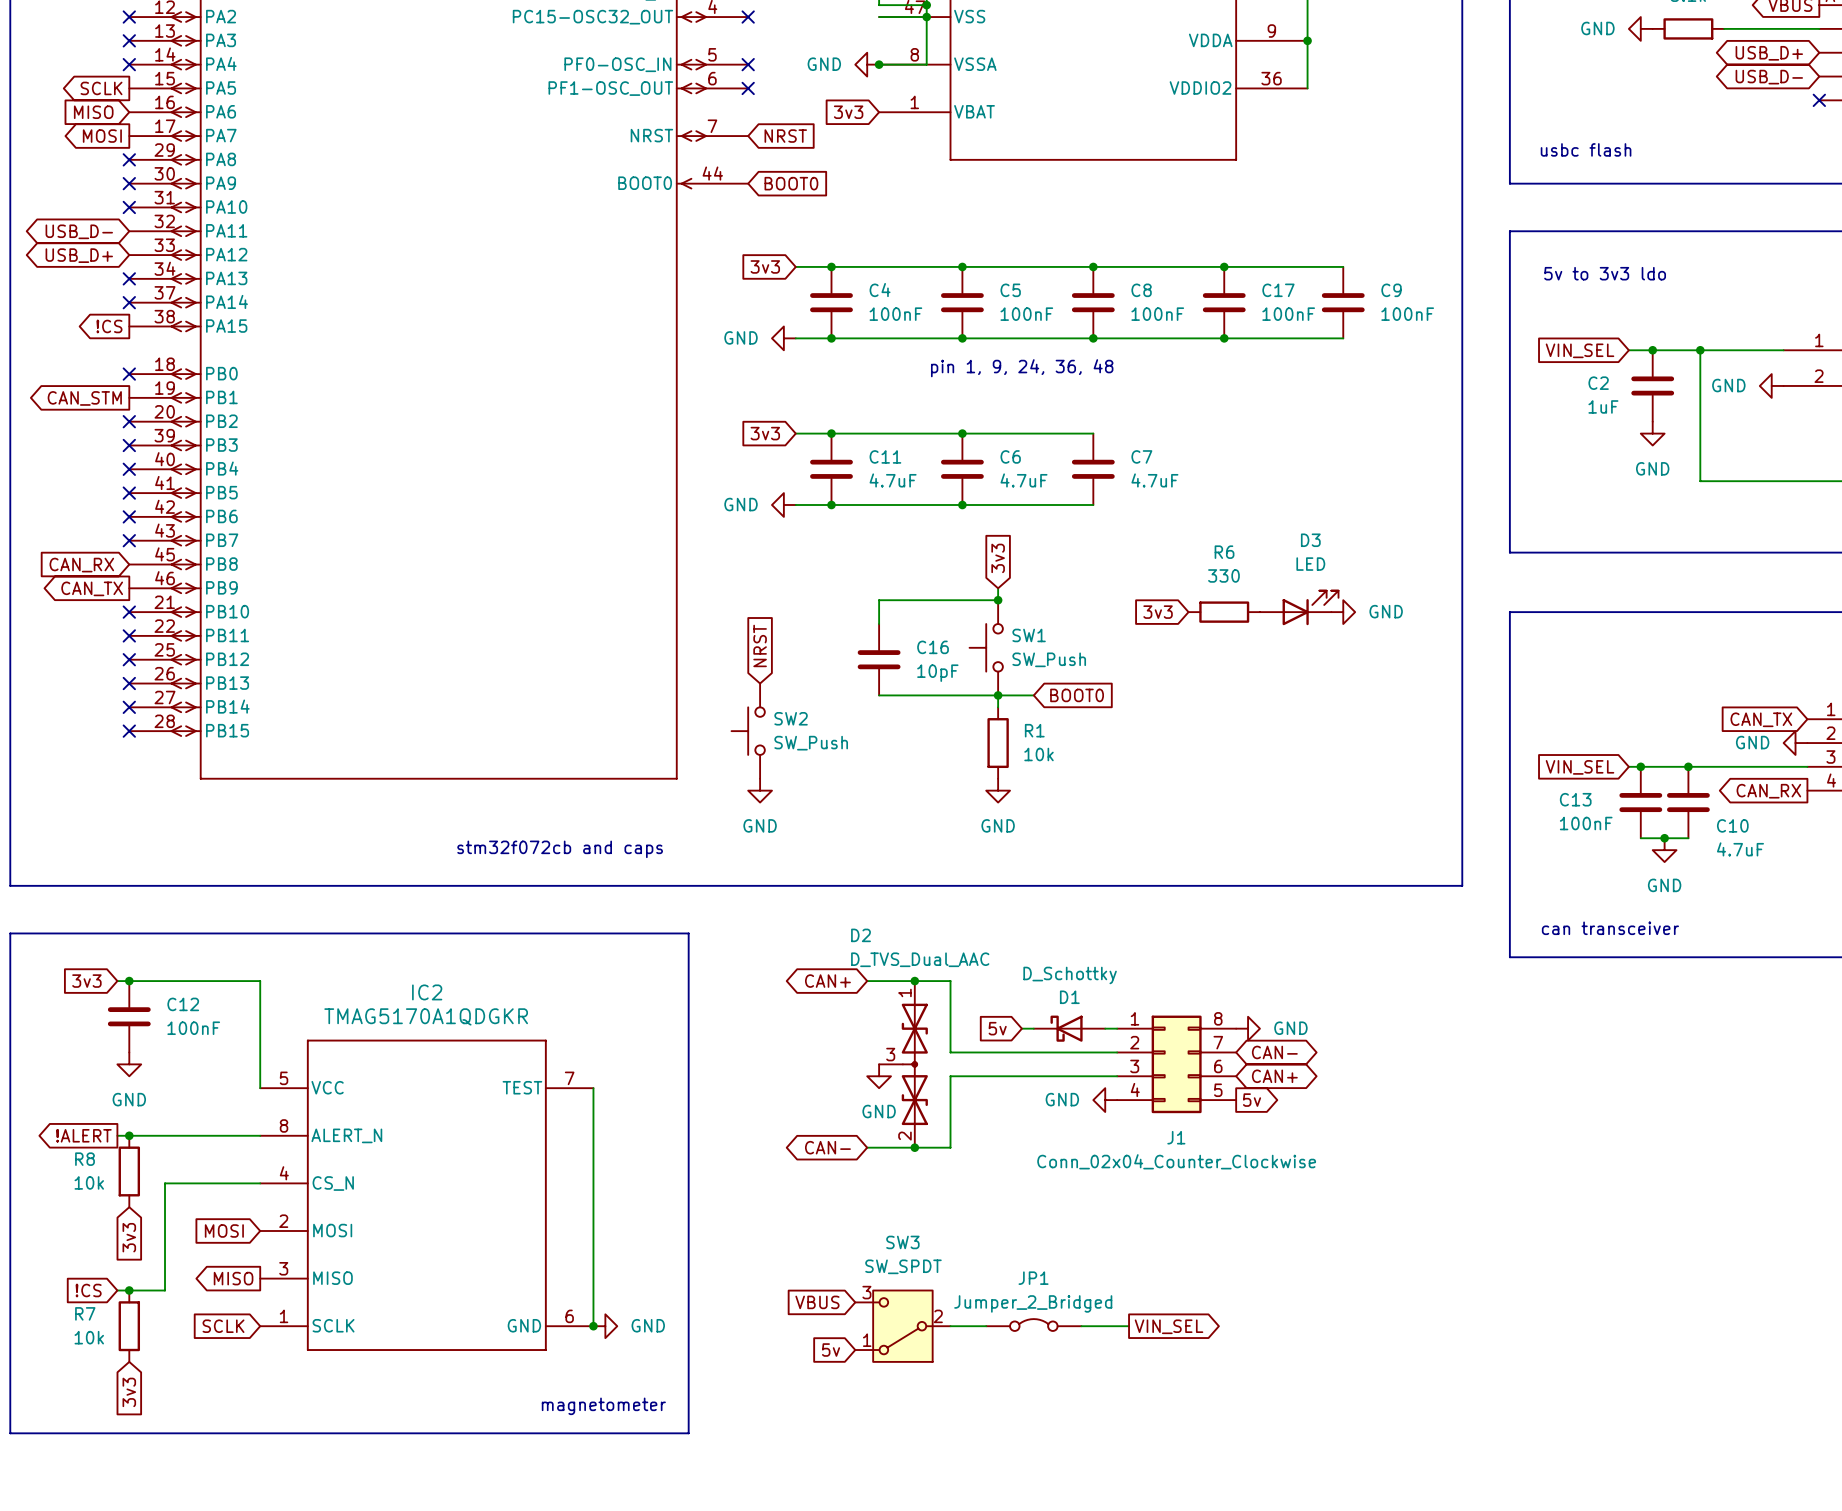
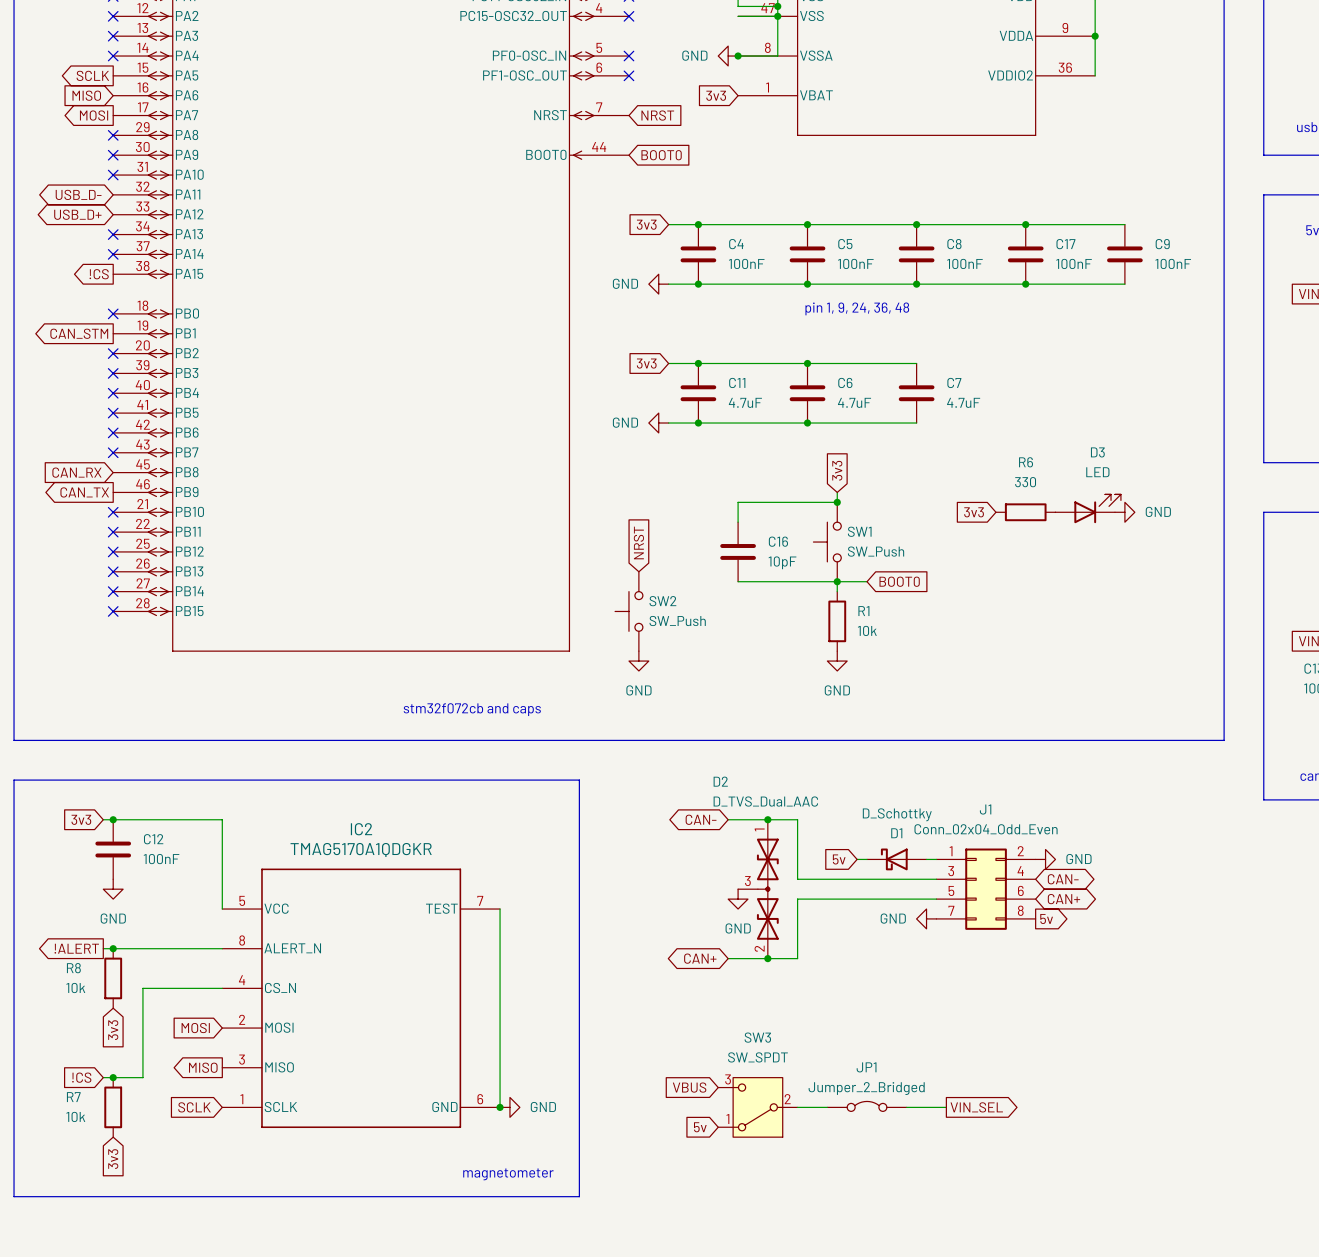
global label: CAN+ (827, 981) -> CAN- (701, 819)
J1 pin number: 8 (1218, 1018) -> 2 (1020, 851)
J1 pin number: 2 (1134, 1042) -> 3 (951, 871)
J1 pin number: 7 (1218, 1042) -> 4 (1020, 871)
J1 pin number: 3 (1134, 1066) -> 5 (951, 890)
J1 pin number: 4 (1135, 1089) -> 7 (951, 910)
J1 pin number: 5 (1218, 1090) -> 8 (1020, 910)
J1 name position: J1 (1176, 1137) -> J1 (985, 809)
global label: CAN- (827, 1147) -> CAN+ (700, 958)
J1 value: Conn_02x04_Counter_Clockwise (1176, 1161) -> Conn_02x04_Odd_Even (986, 829)

